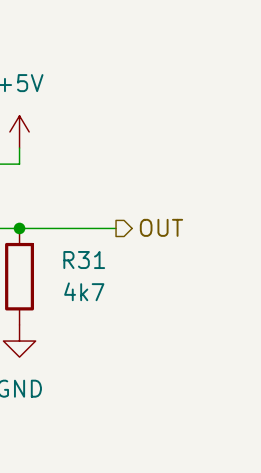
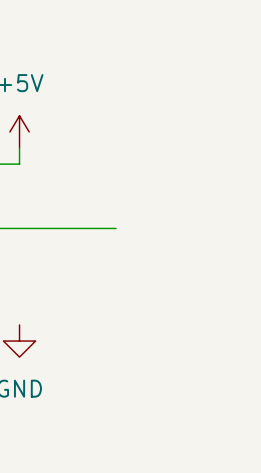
hierarchical label: OUT (161, 227) -> none
junction: (19, 228) -> none
R31: 4k7 (19, 276) -> none

